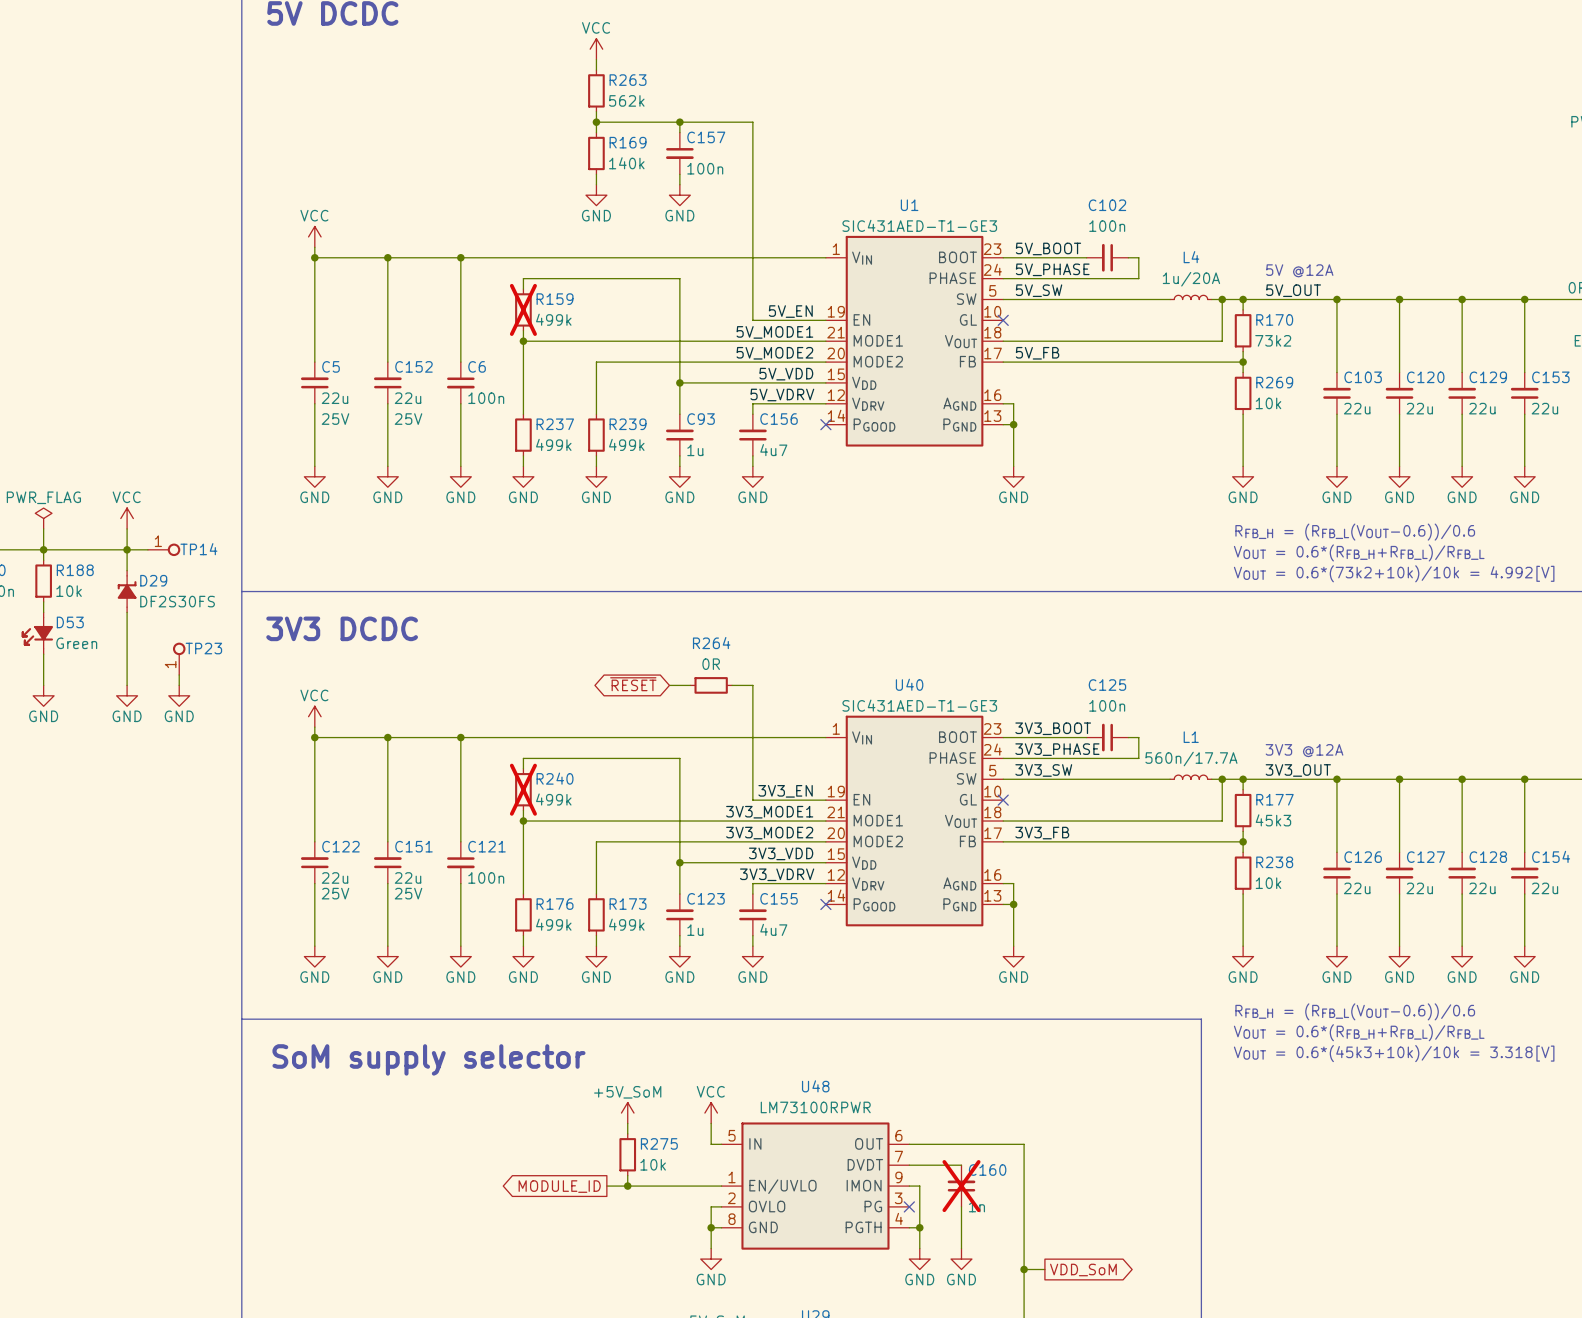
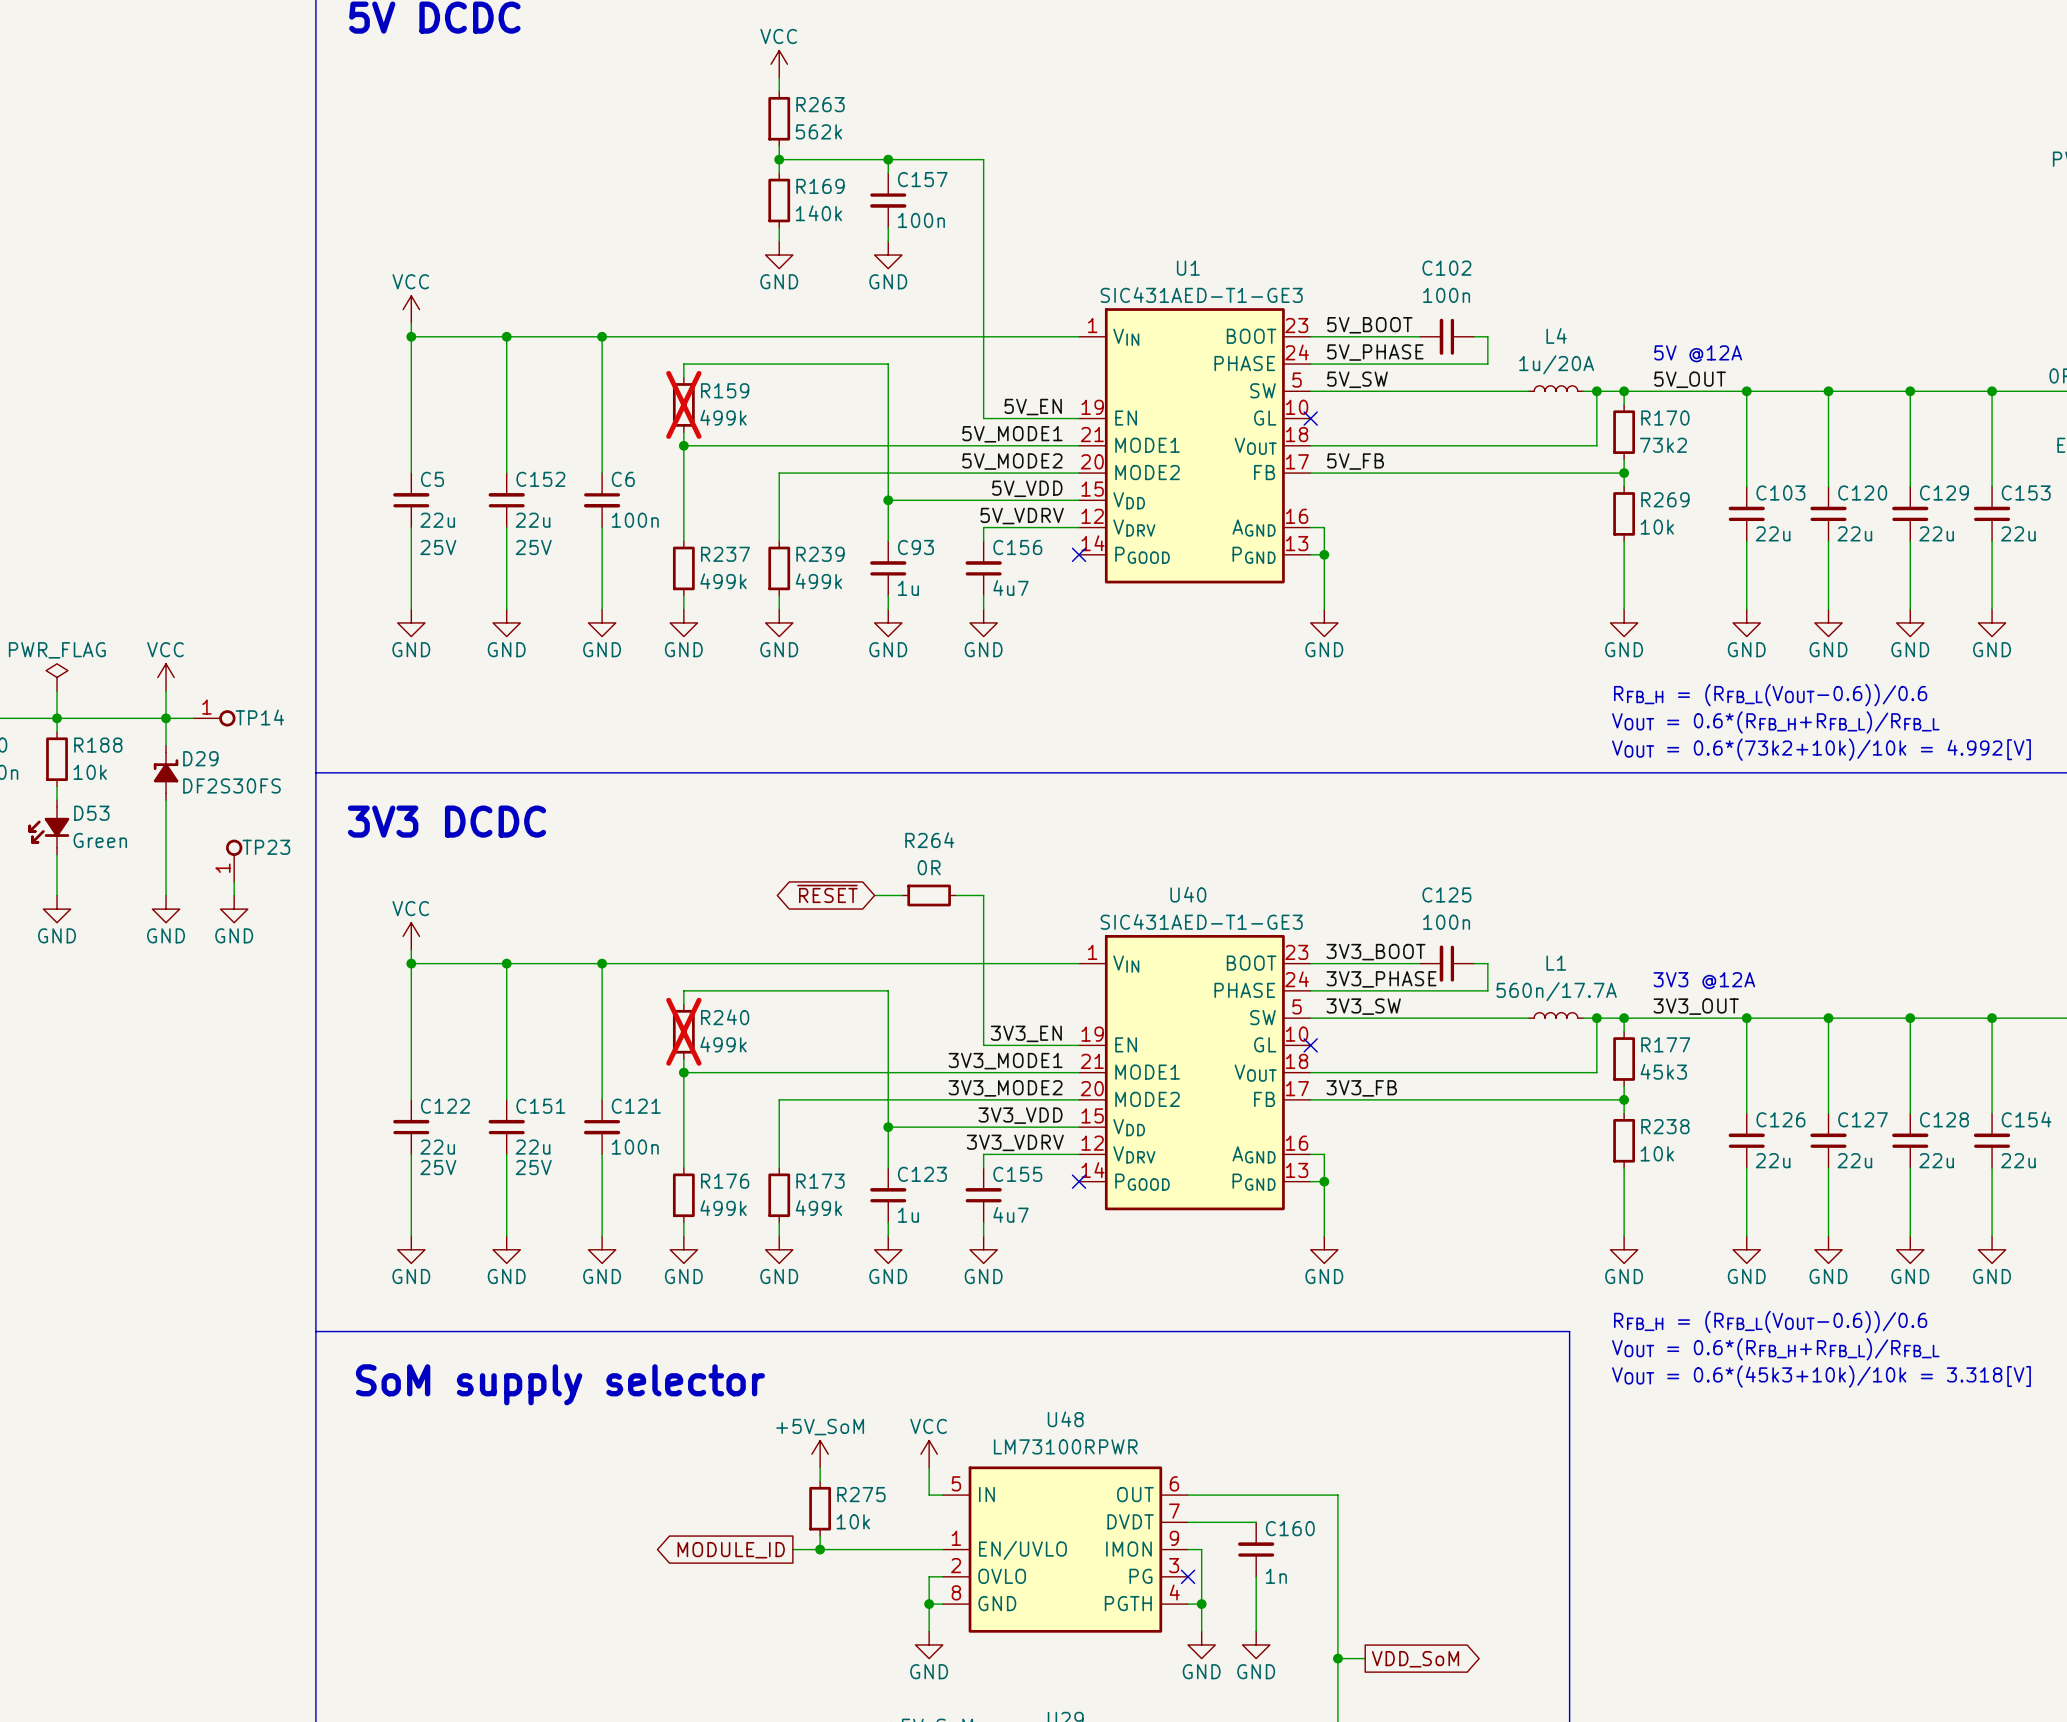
C160 do-not-place cross: (961, 1186) -> none

